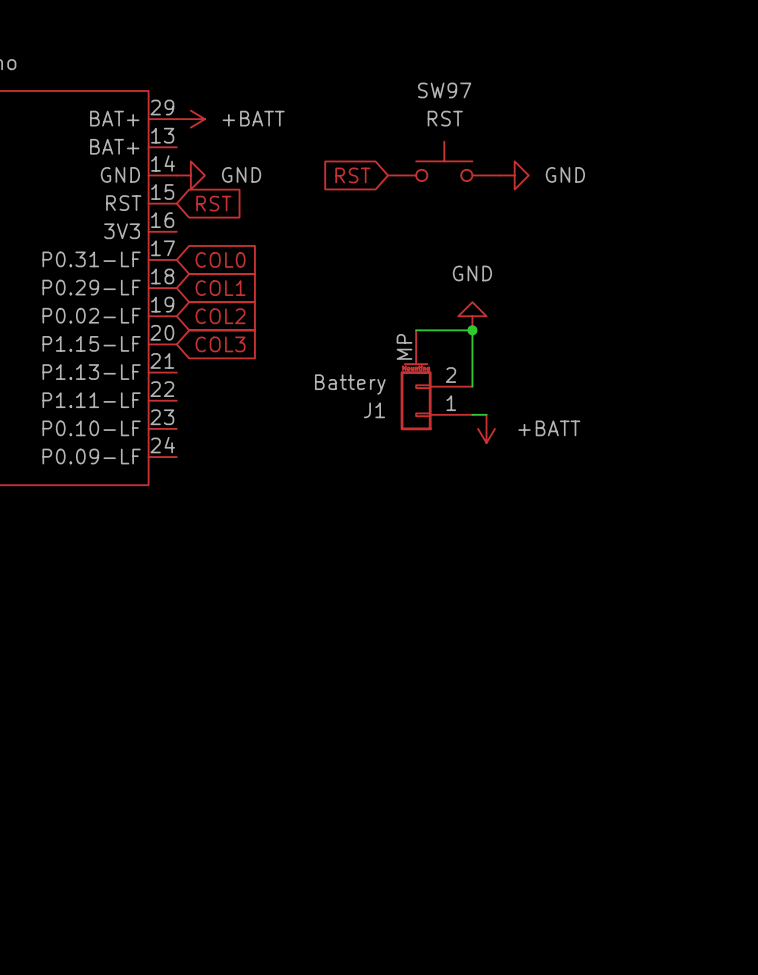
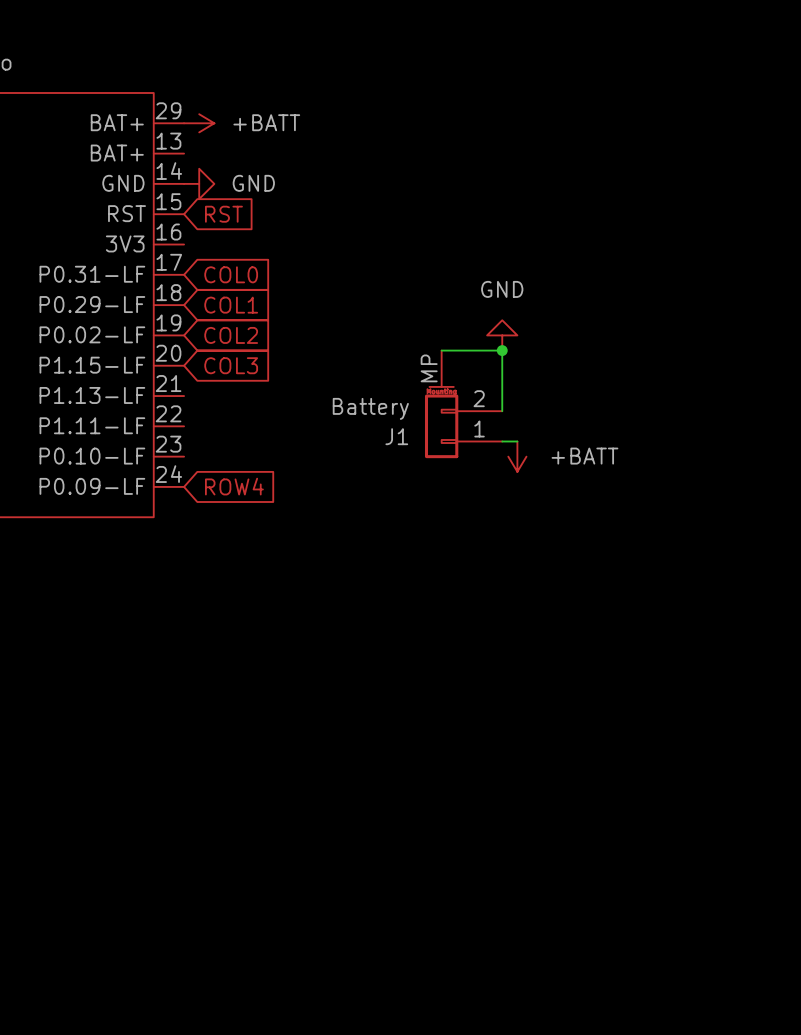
SW97: RST (444, 161) -> none
global label: RST (352, 175) -> none
power symbol: GND (514, 175) -> none
global label: none -> ROW4 (234, 486)

